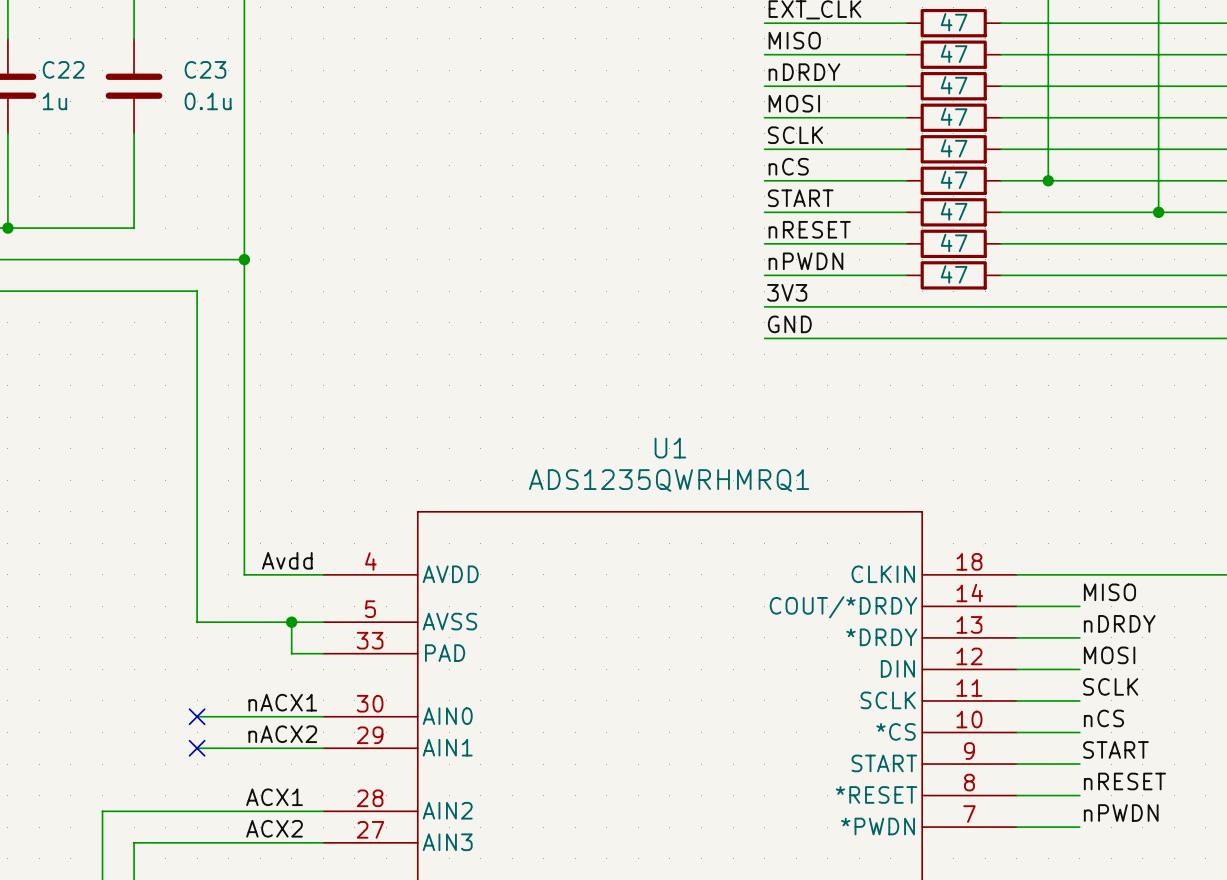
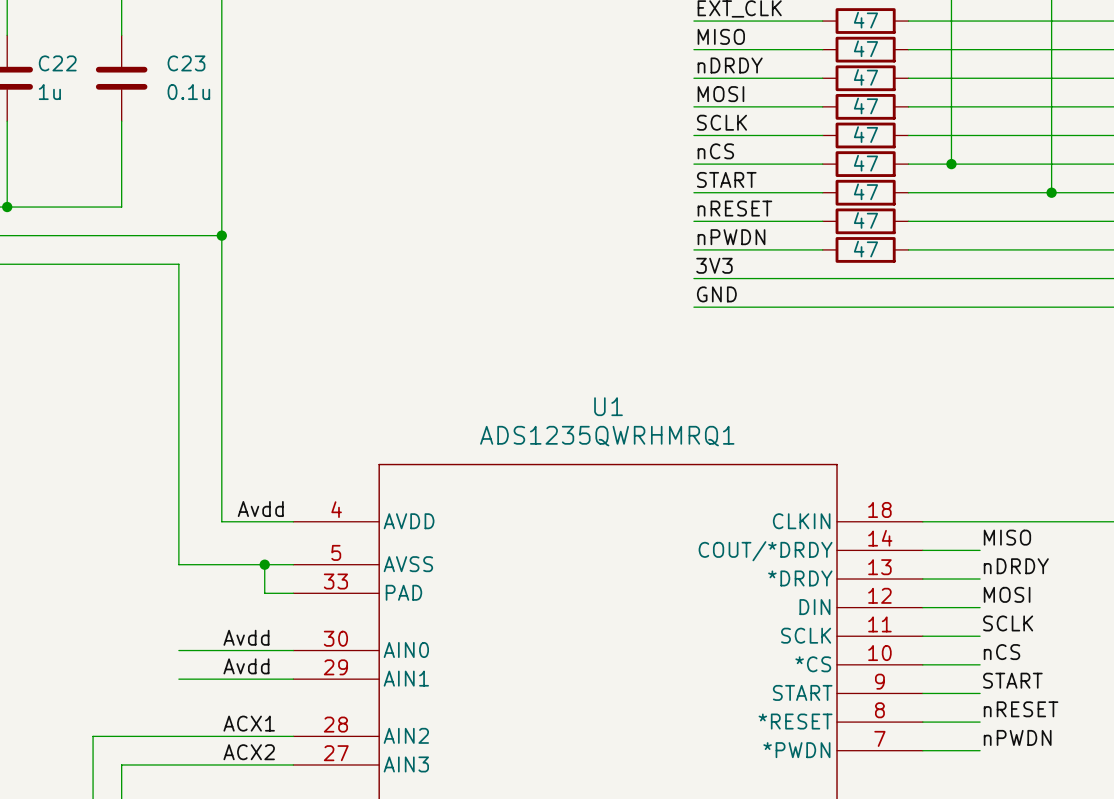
label: nACX1 (282, 702) -> Avdd (246, 637)
no-connect mark: (197, 716) -> none
label: nACX2 (282, 734) -> Avdd (246, 666)
no-connect mark: (197, 748) -> none

